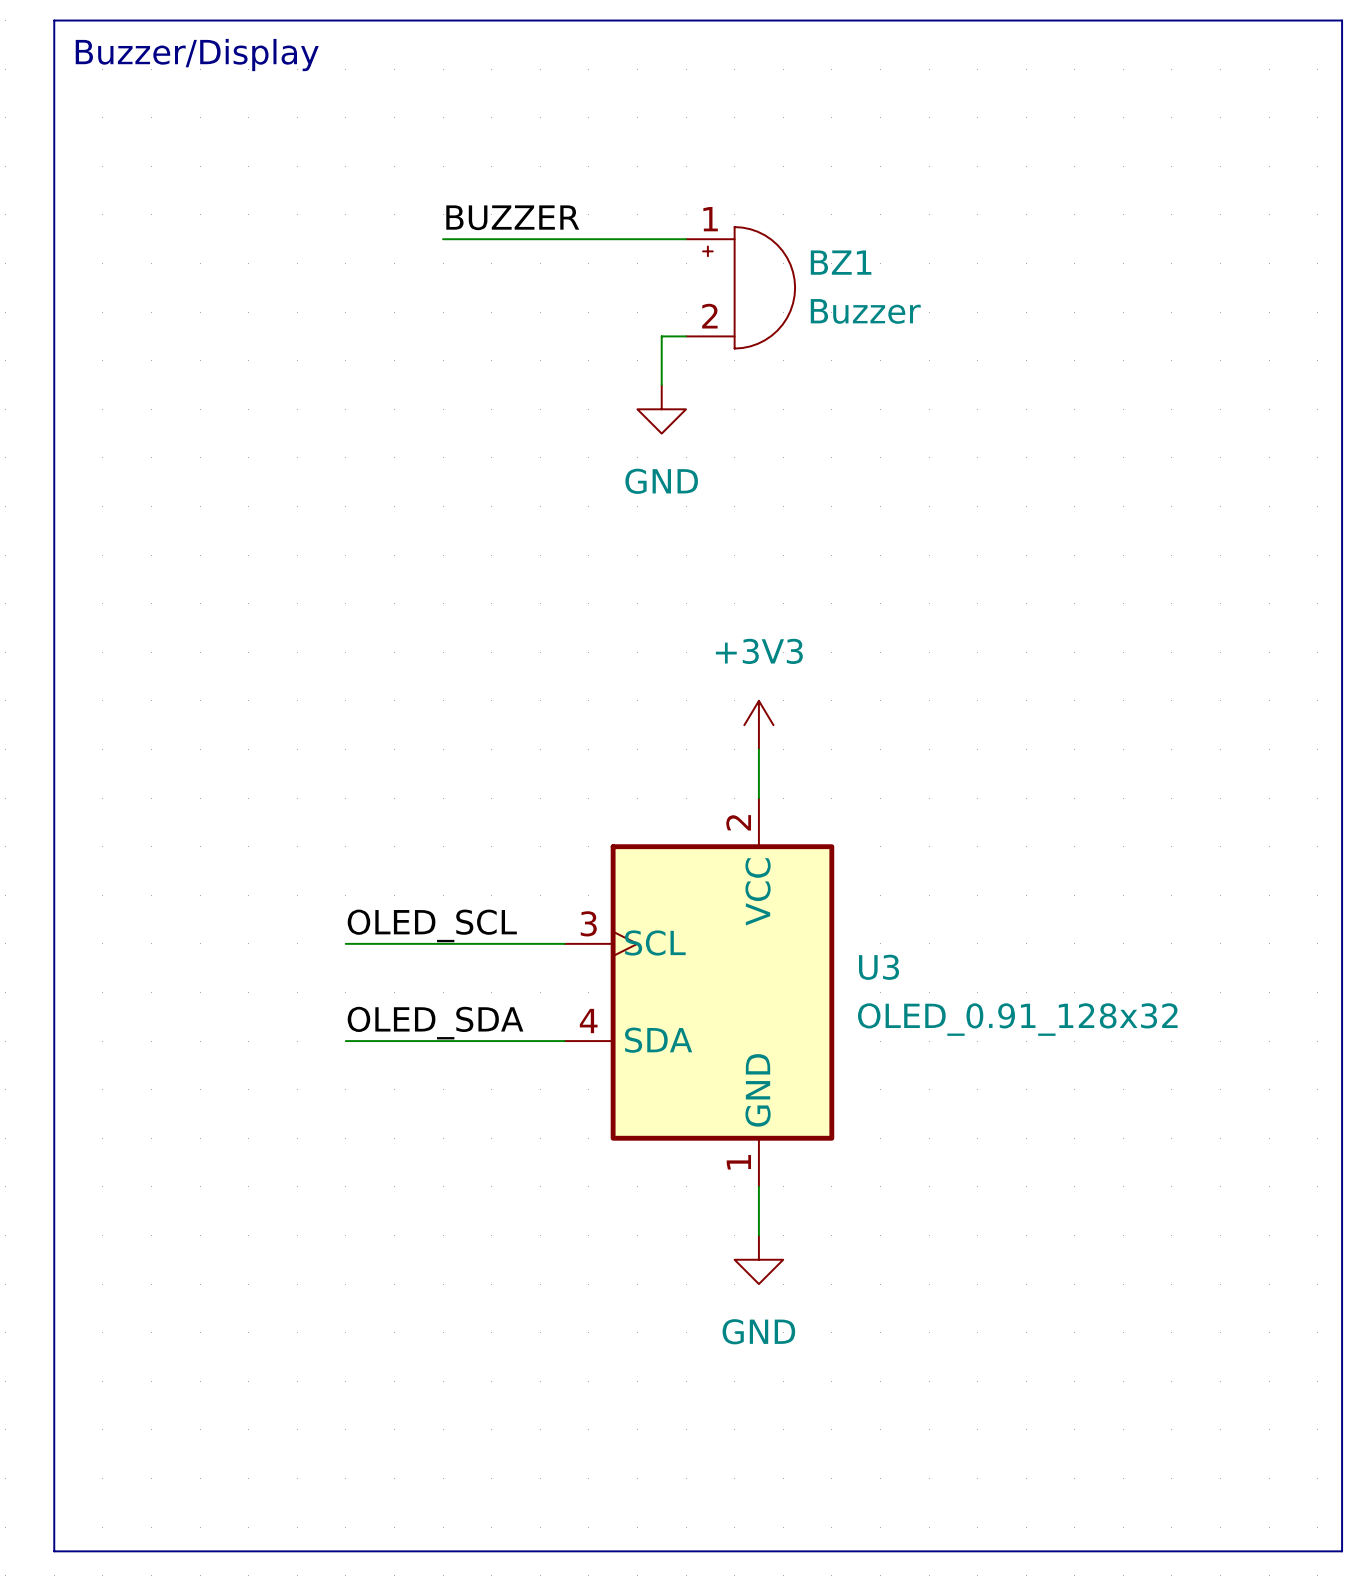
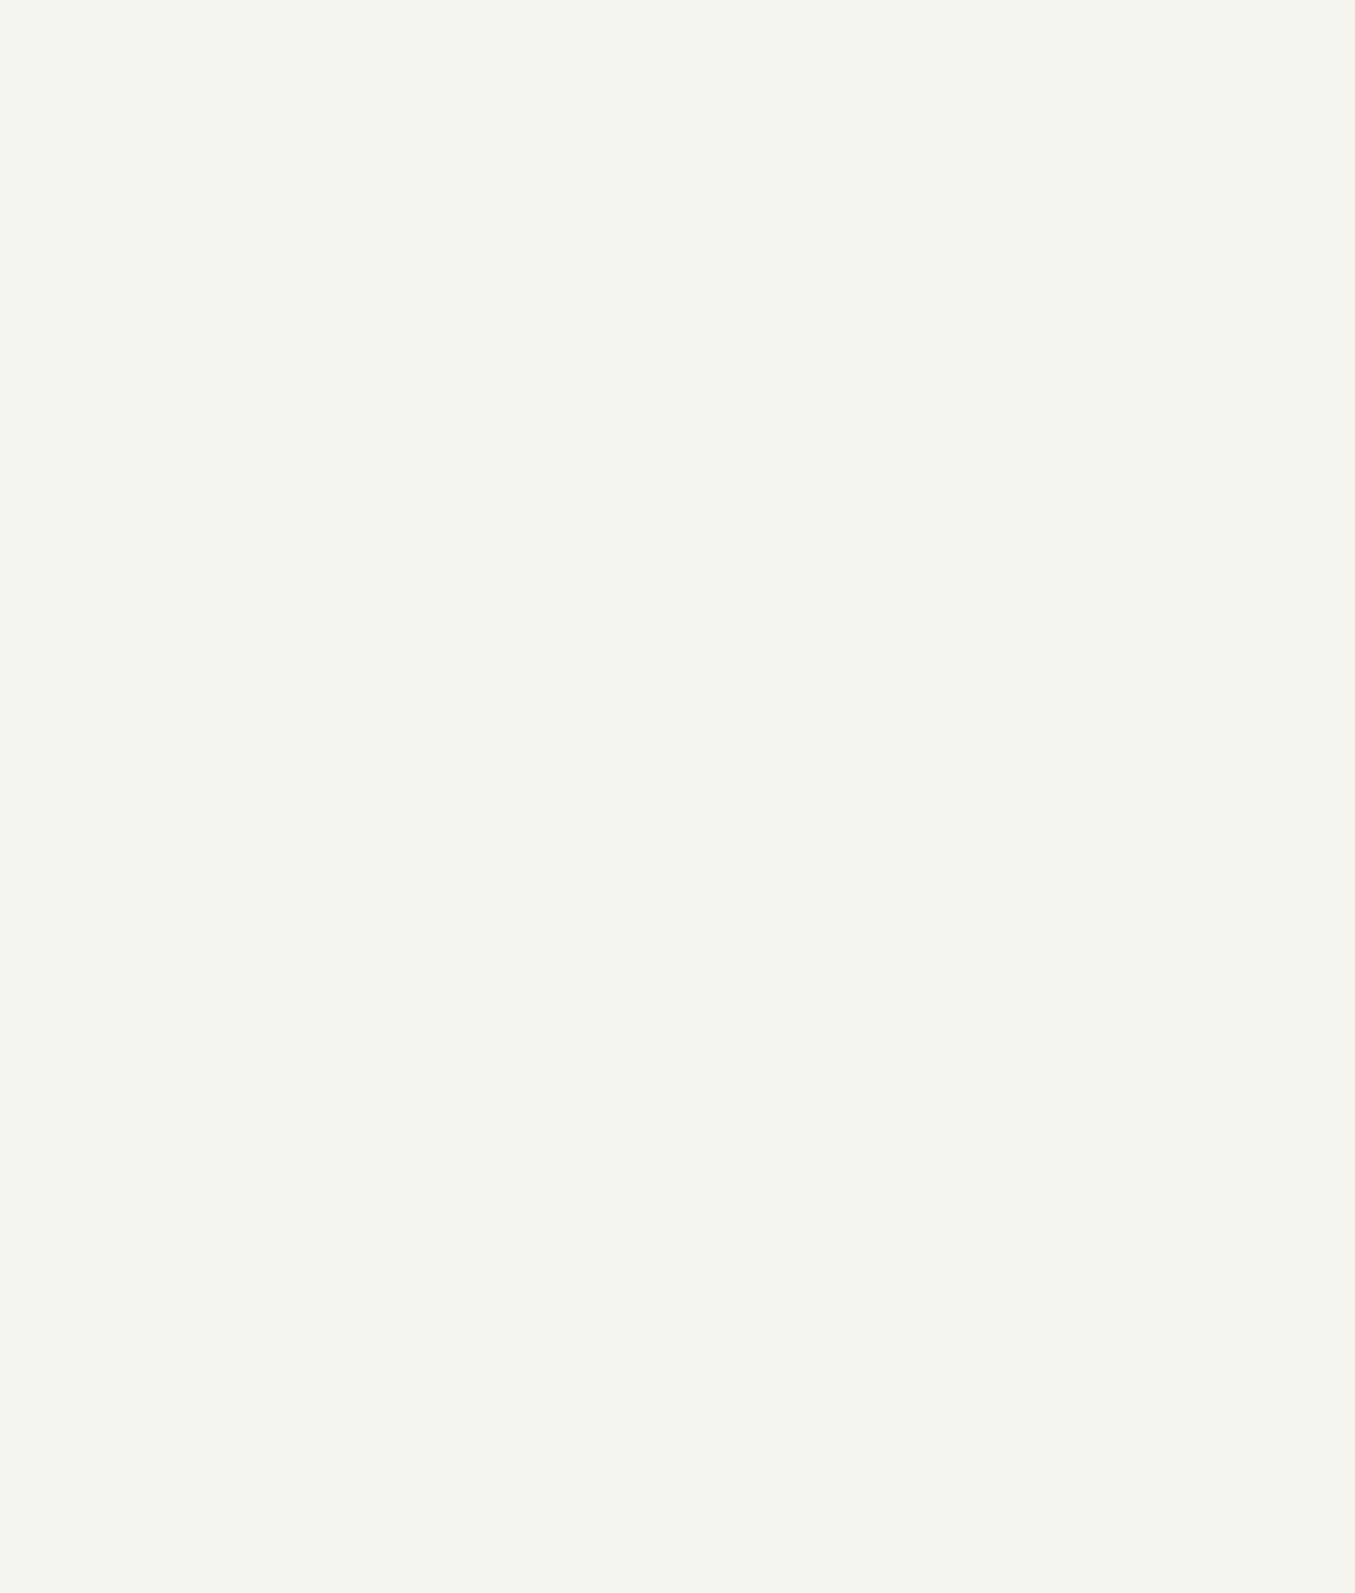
line: (54, 20) (1342, 20) (1342, 1551) (54, 1551) (54, 20) -> none
text: Buzzer/Display (197, 55) -> none
label: BUZZER (512, 217) -> none
wire: (443, 239) (686, 239) -> none
BZ1: Buzzer (740, 287) -> none
wire: (686, 336) (661, 336) (661, 385) -> none
power symbol: GND (661, 409) -> none
power symbol: +3V3 (758, 725) -> none
wire: (758, 749) (758, 798) -> none
label: OLED_SCL (432, 925) -> none
wire: (345, 943) (564, 943) -> none
U3: OLED_0.91_128x32 (699, 992) -> none
label: OLED_SDA (435, 1023) -> none
wire: (345, 1041) (564, 1041) -> none
wire: (758, 1186) (758, 1235) -> none
power symbol: GND (758, 1259) -> none

